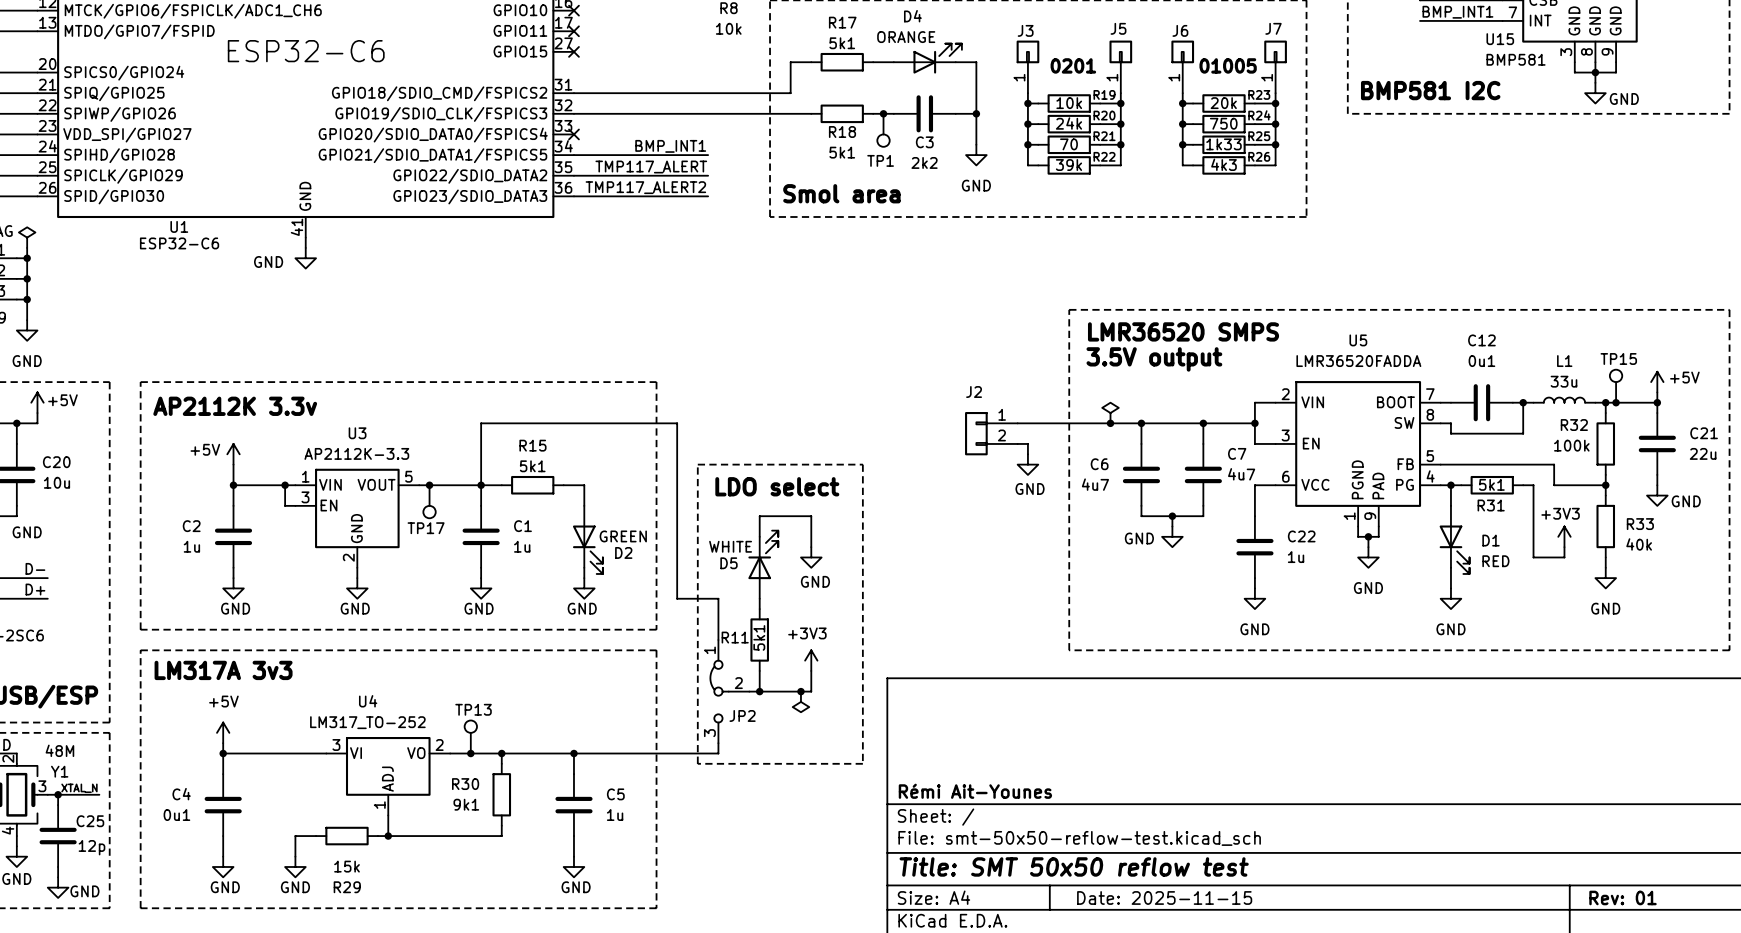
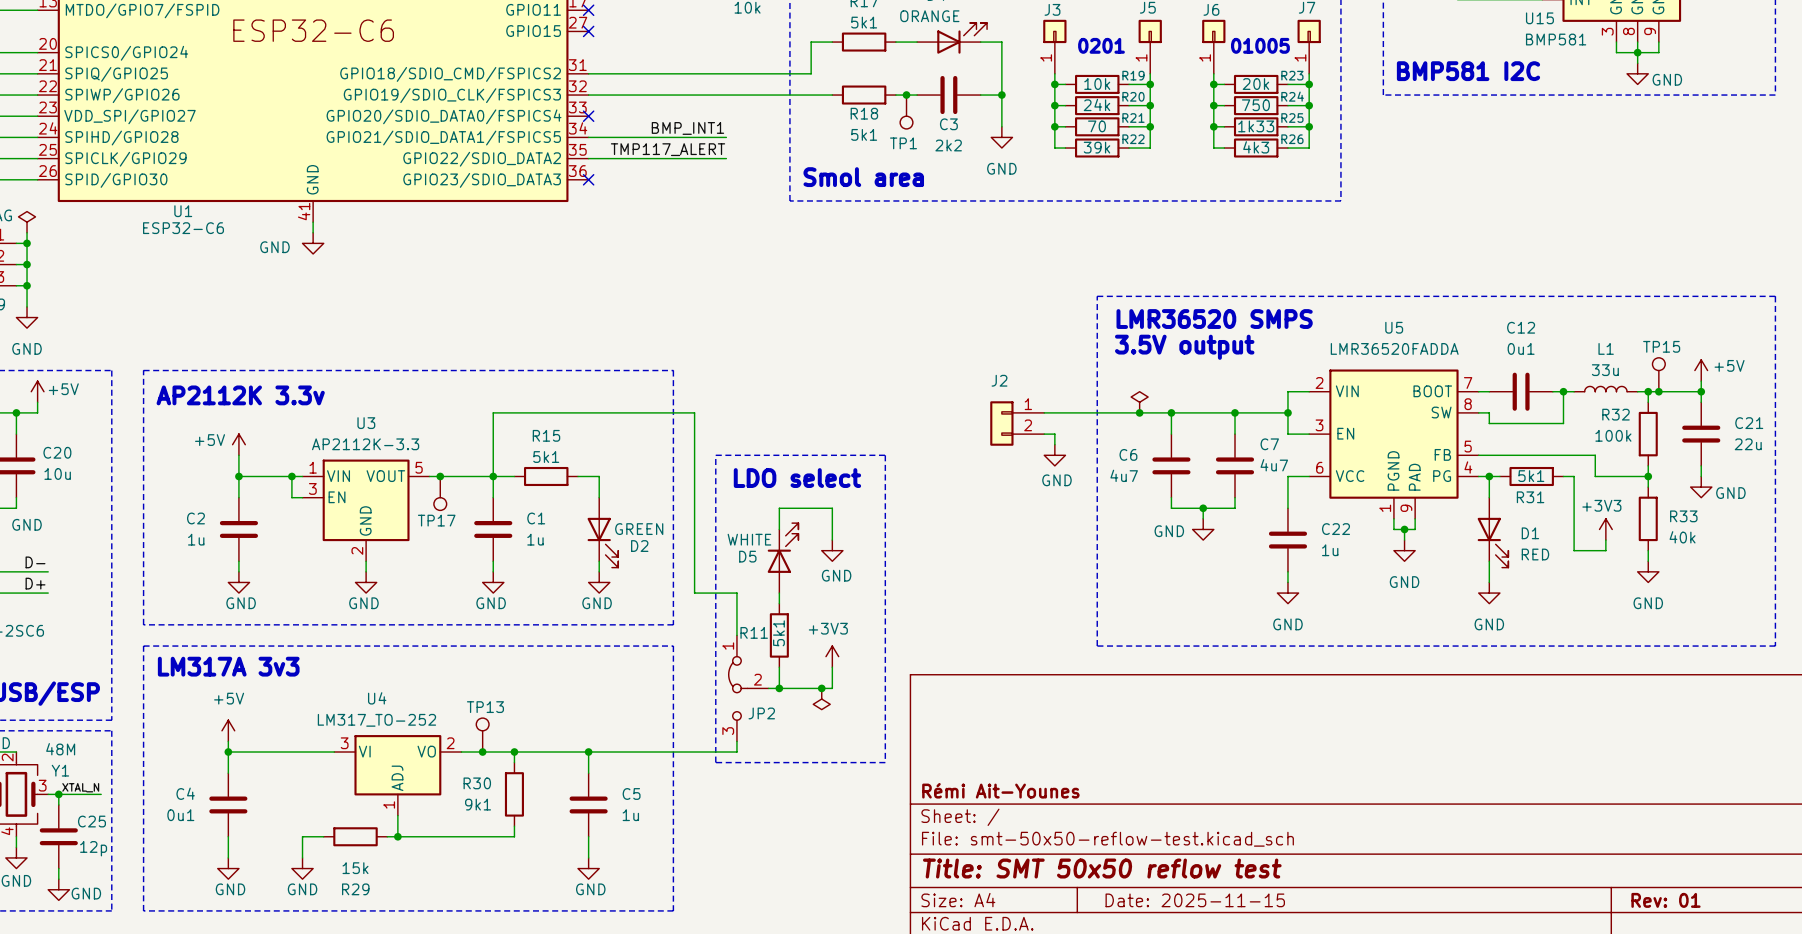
label: TMP117_ALERT2 (645, 187) -> none
wire: (573, 196) (708, 196) -> none
no-connect mark: none -> (588, 179)

